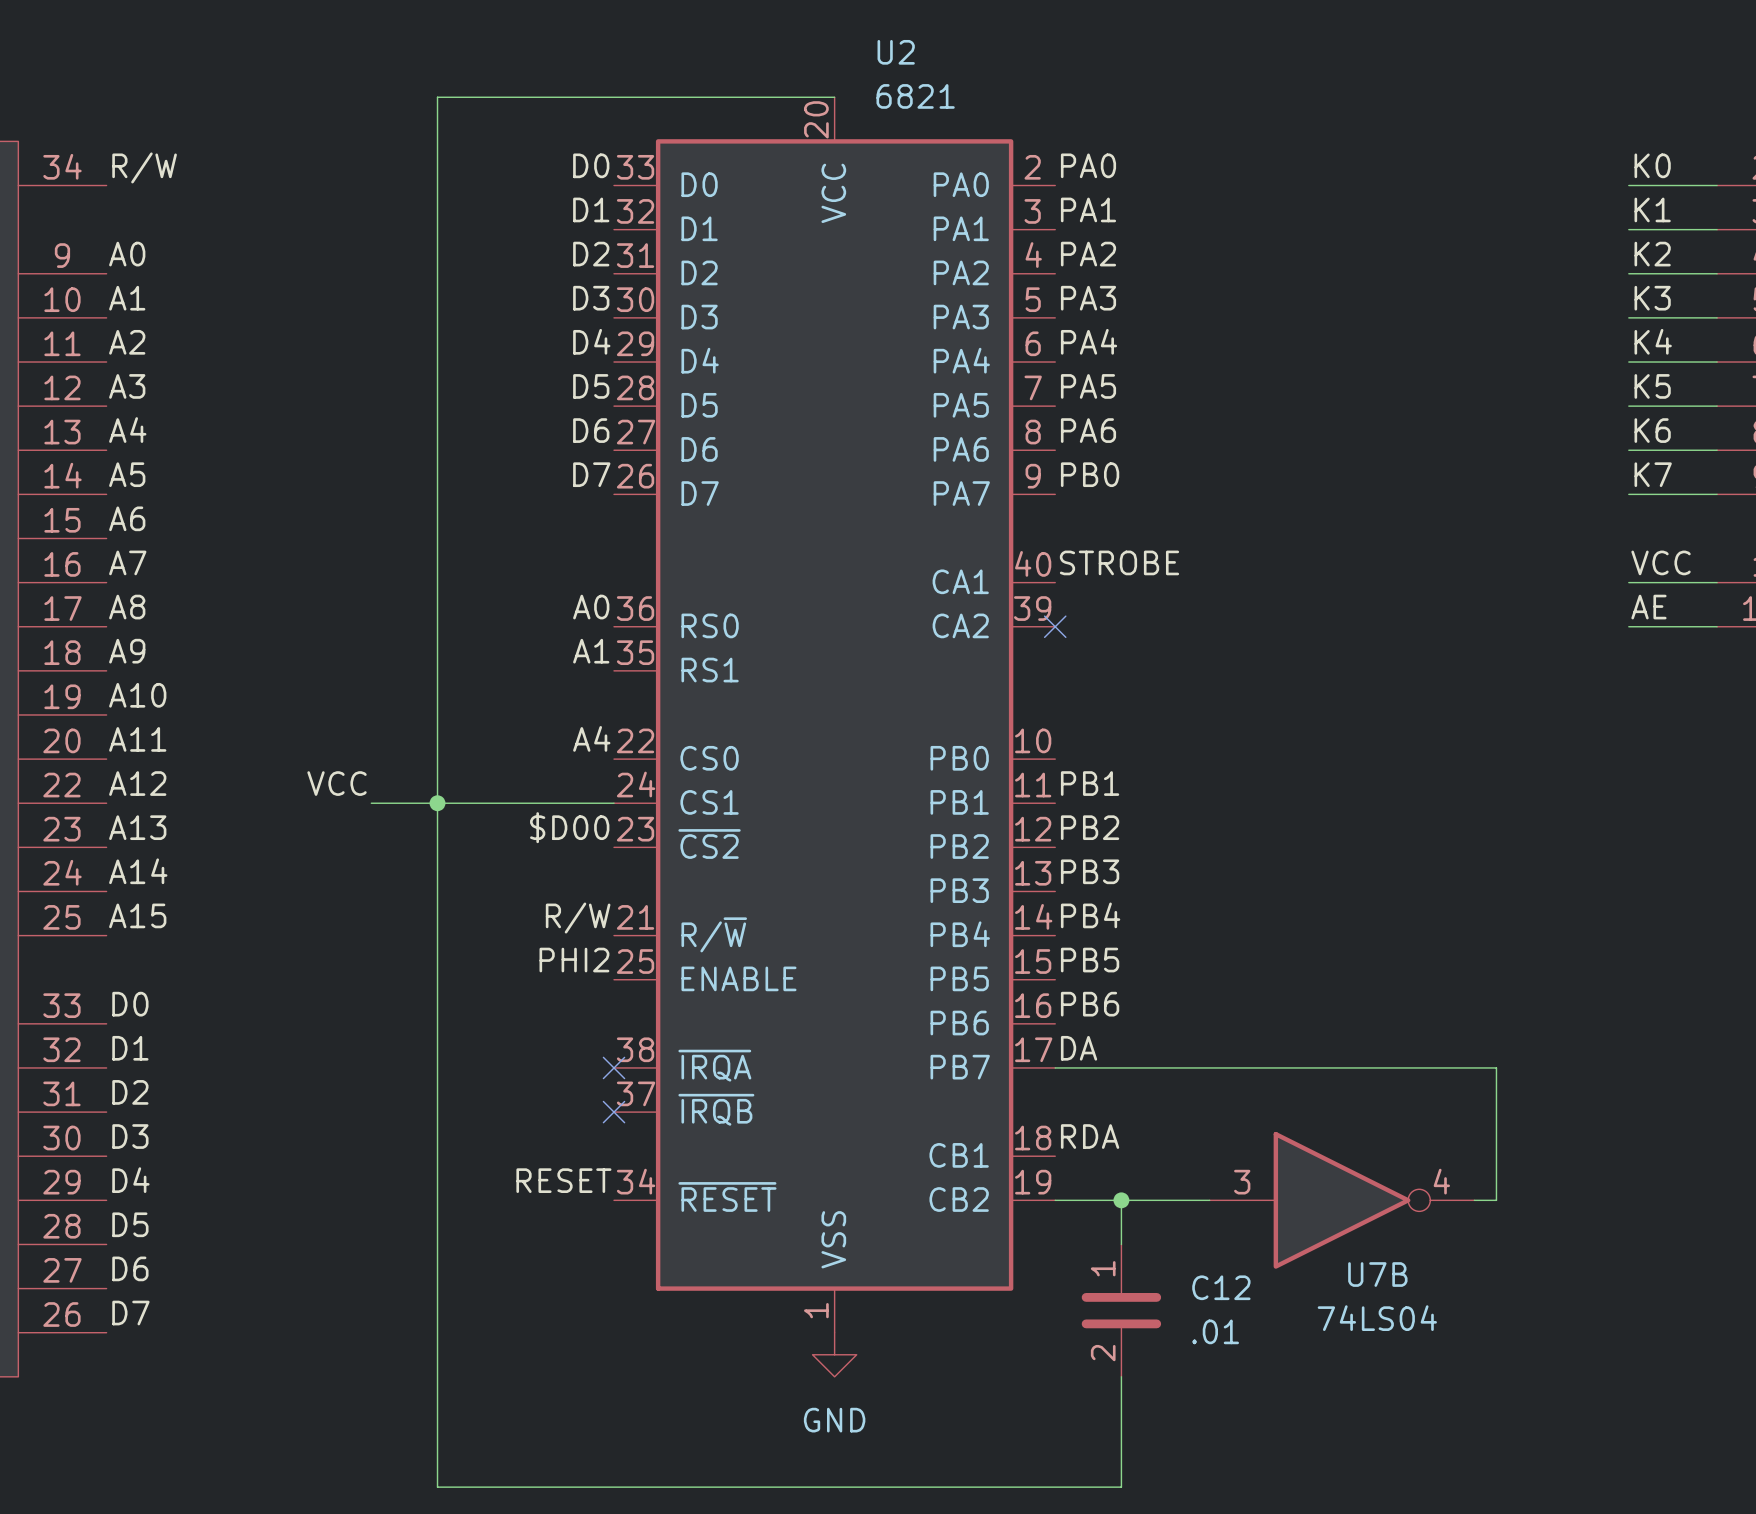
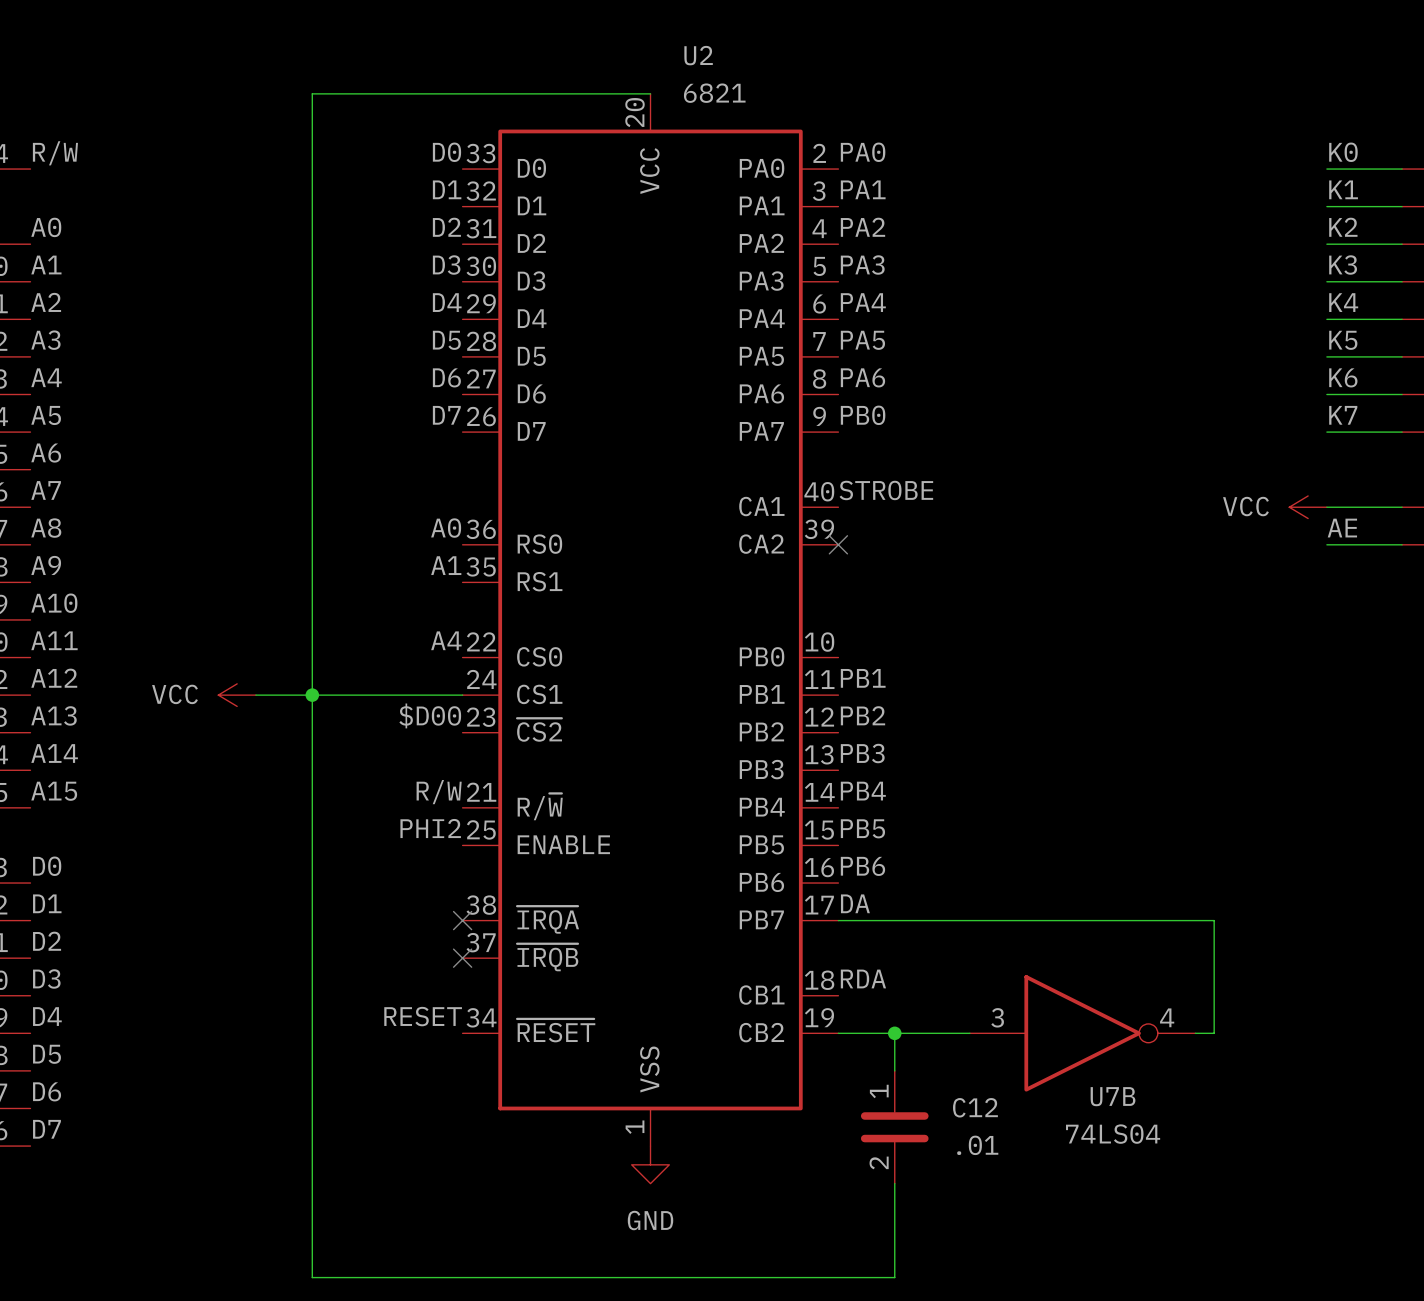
label: VCC (1661, 562) -> none
power symbol: none -> VCC (1308, 507)
label: VCC (337, 783) -> none
power symbol: none -> VCC (237, 695)

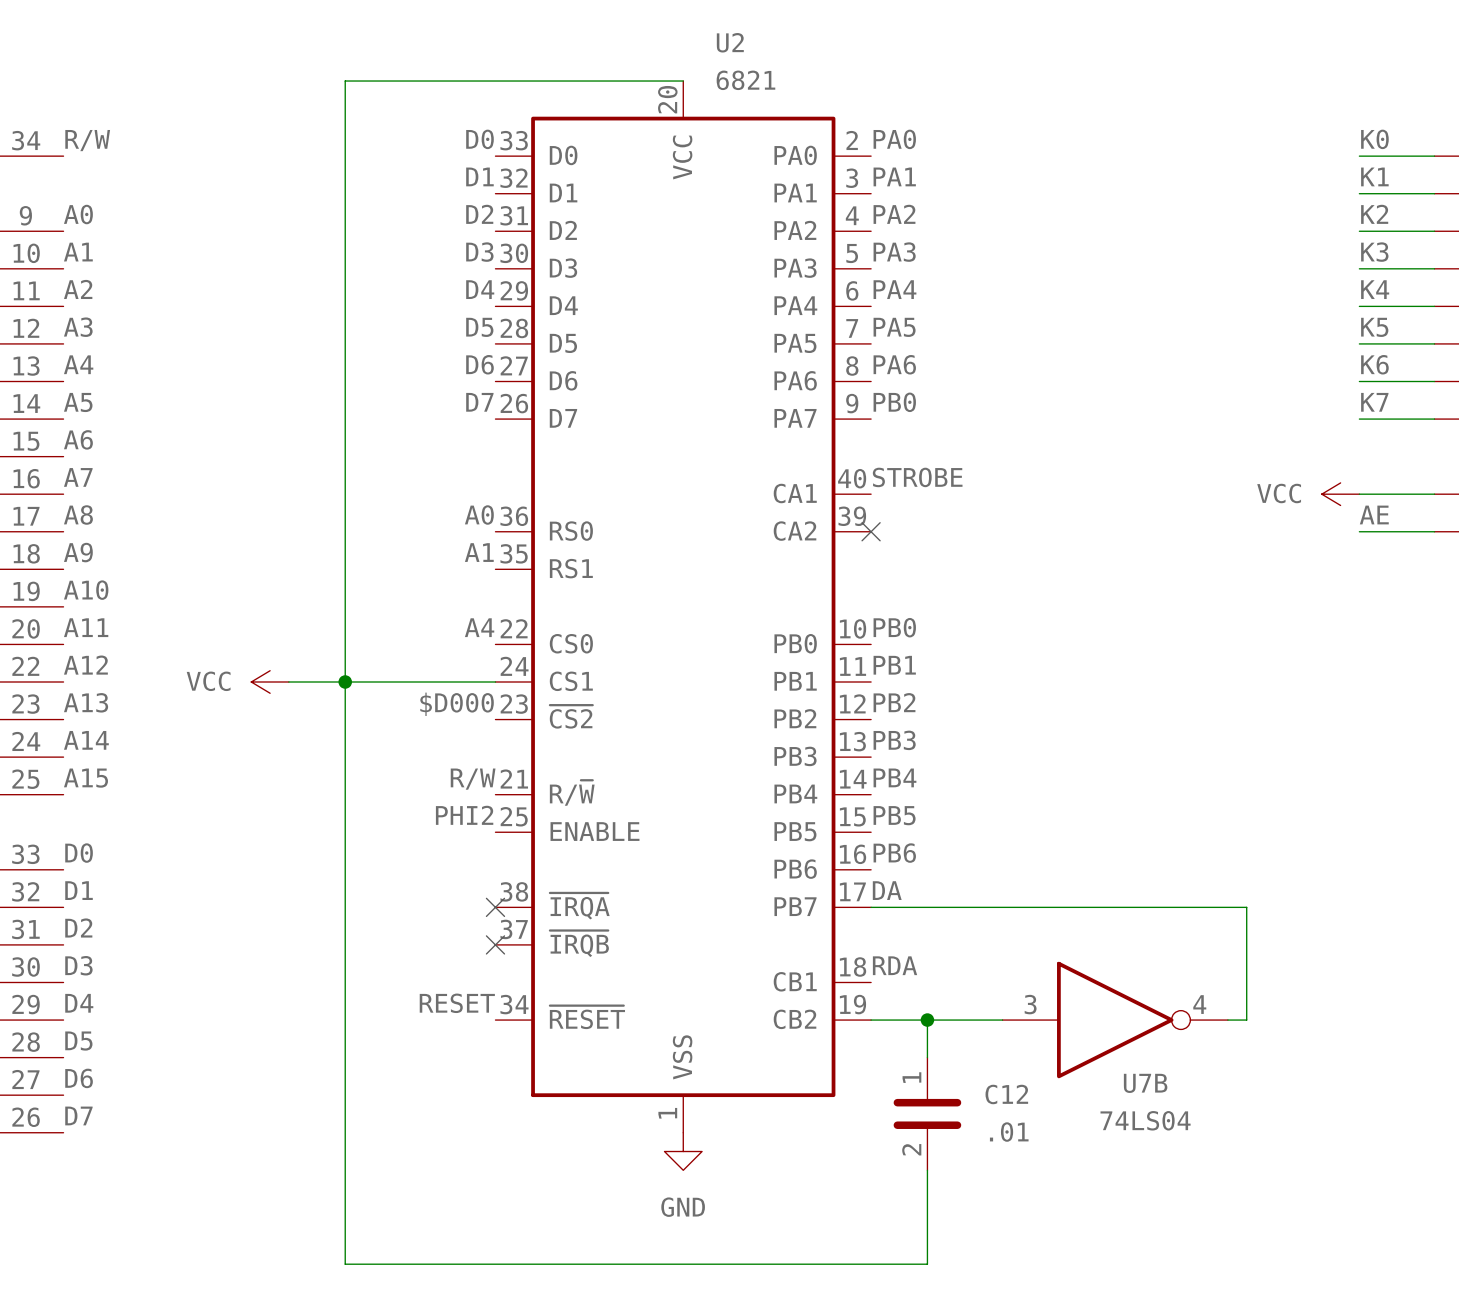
label: none -> PB0 (894, 627)
label: $D00 (430, 715) -> $D000 (457, 704)

